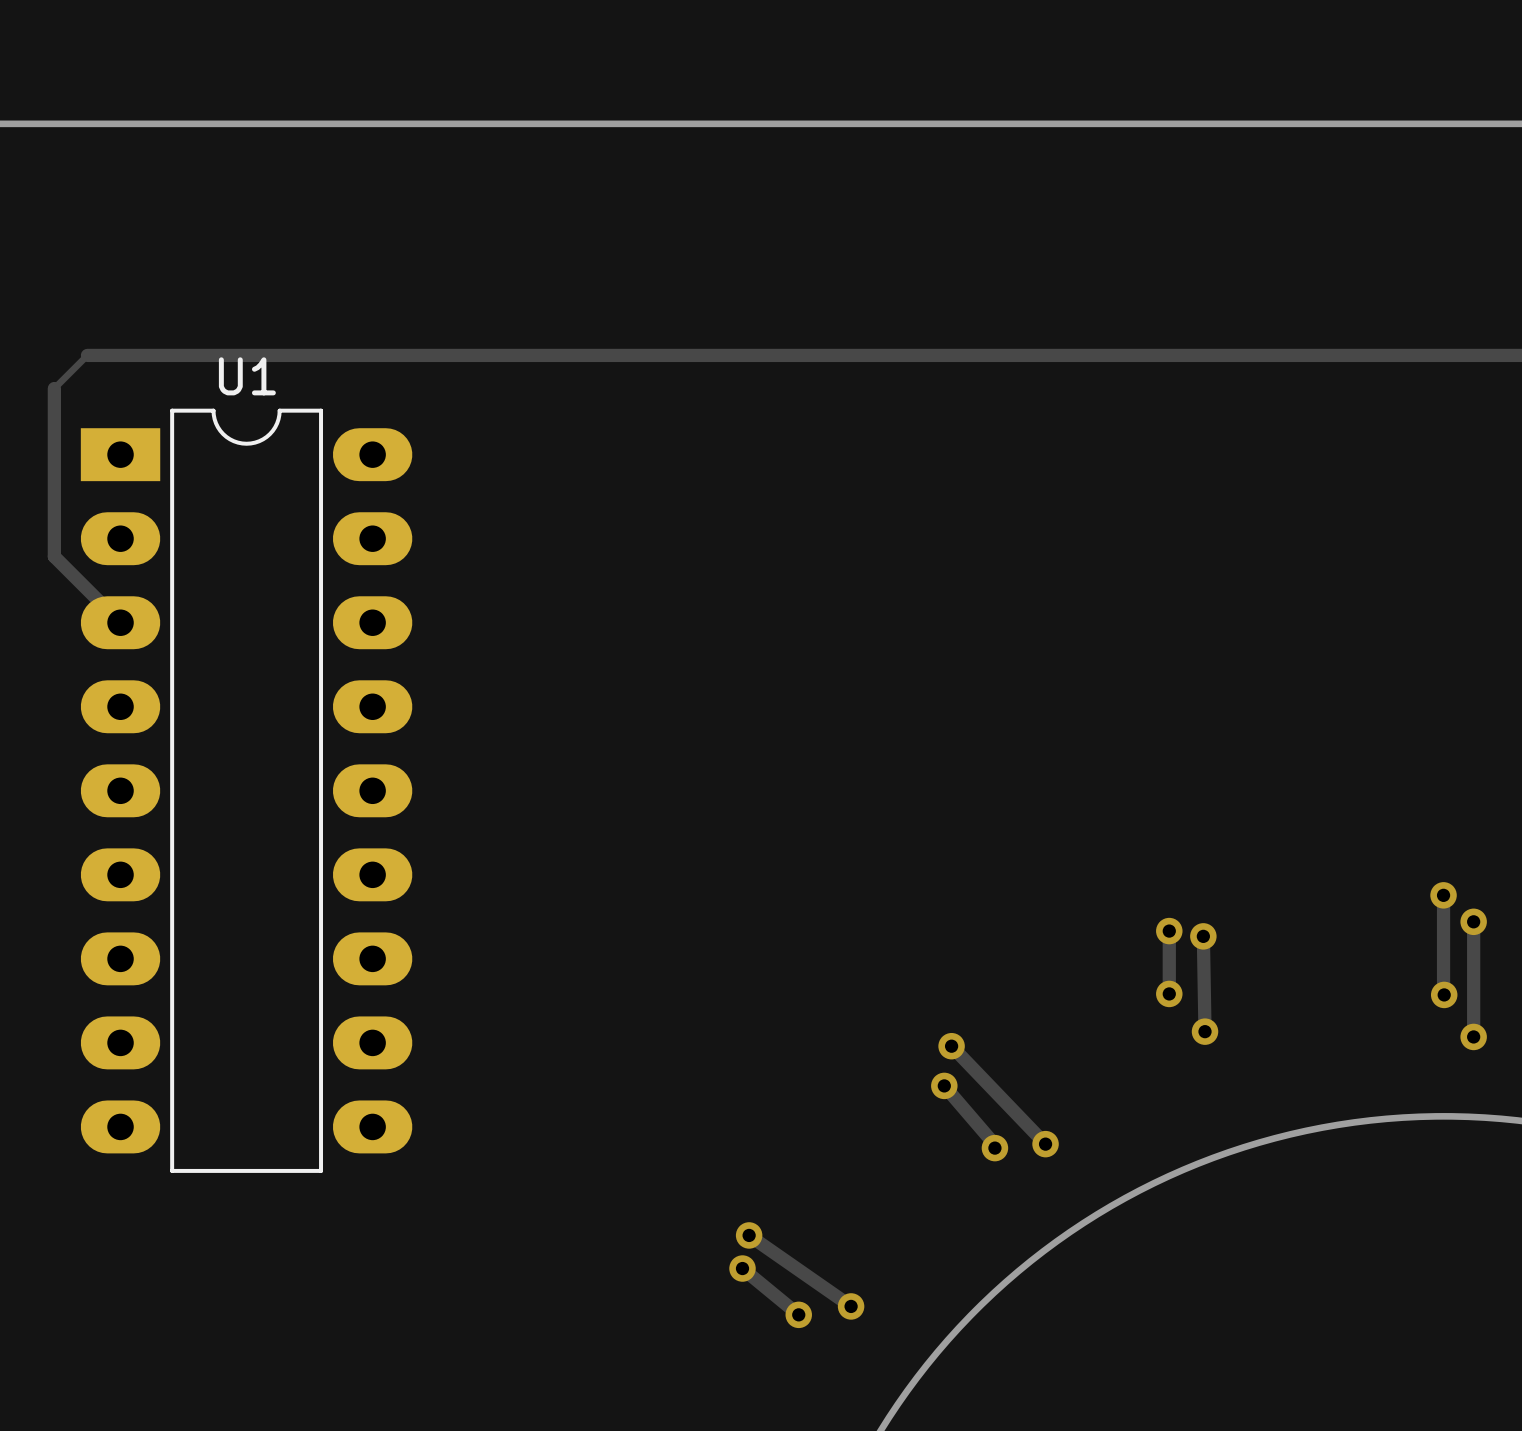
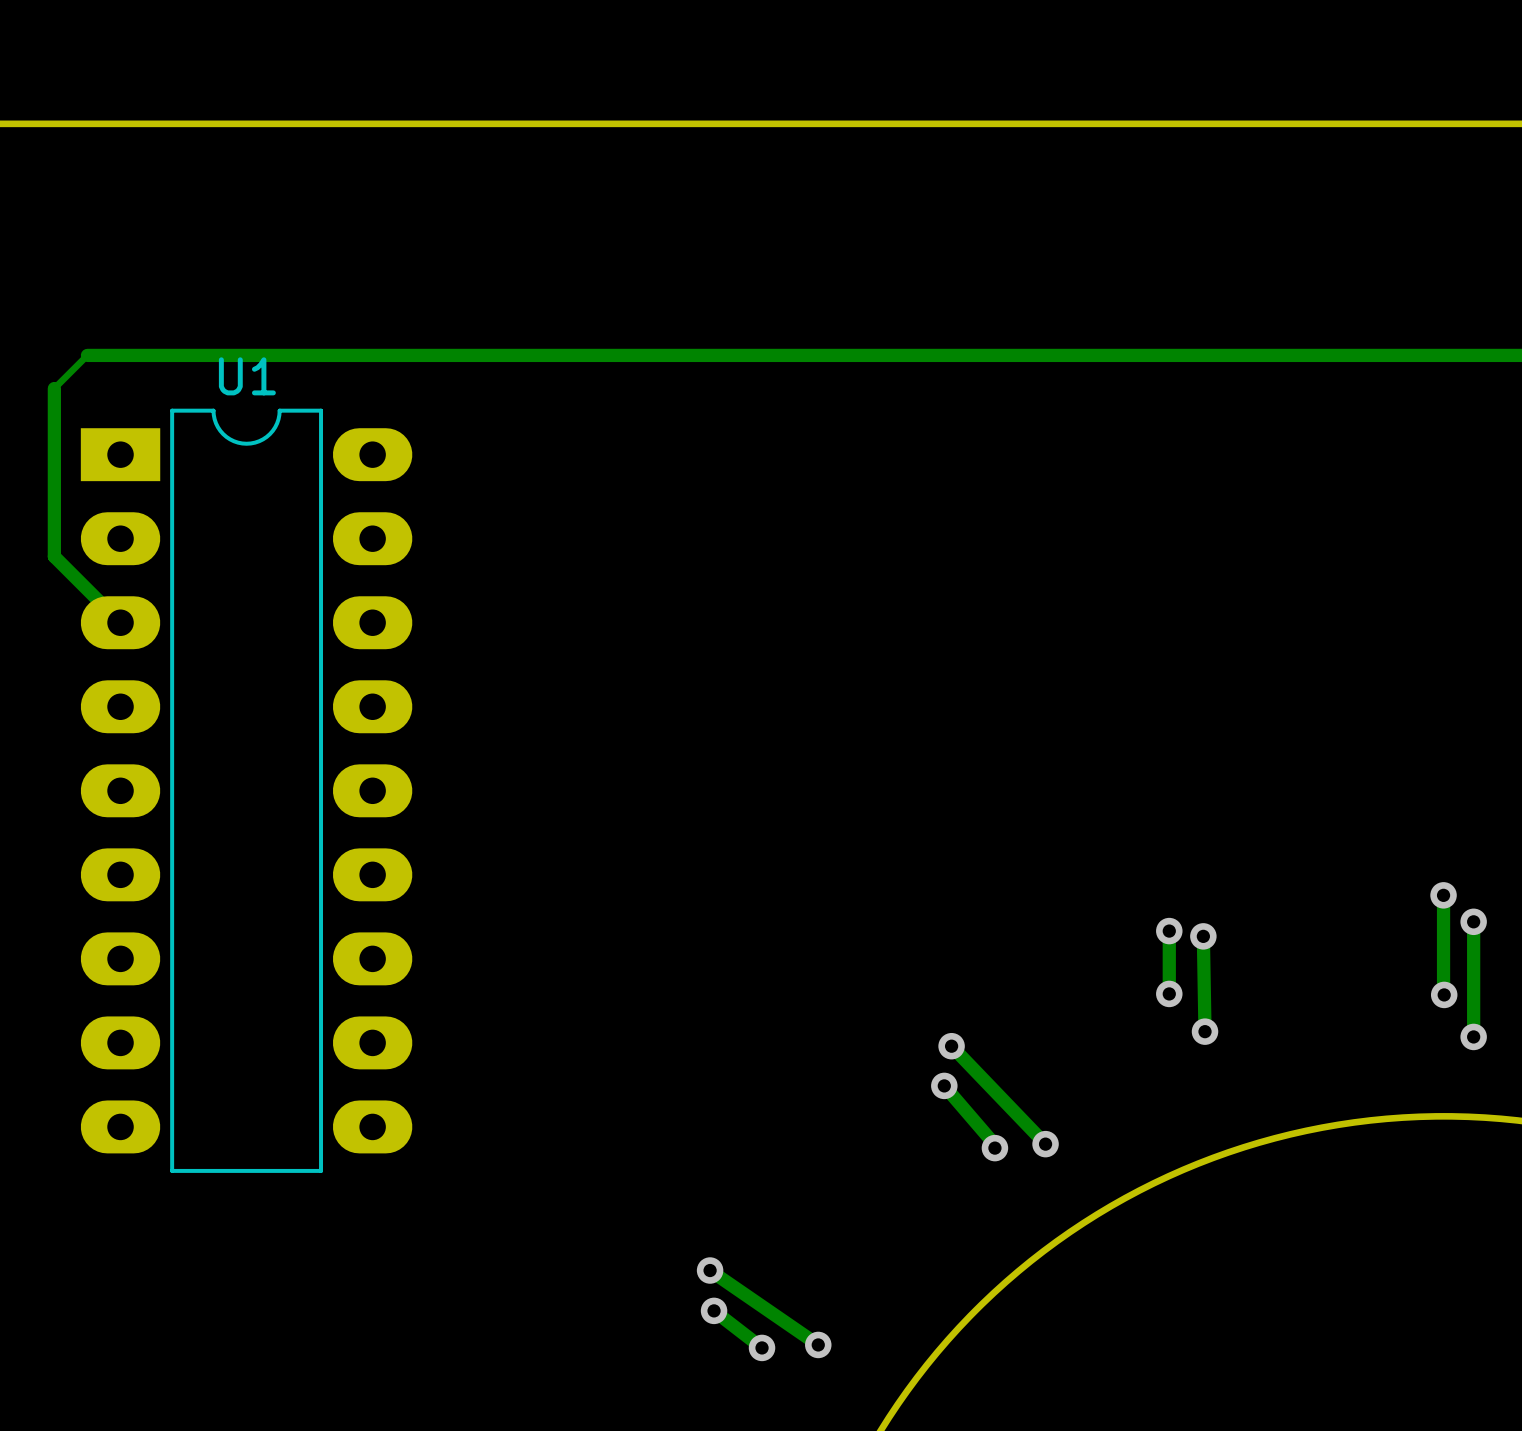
track: (749, 1235) (851, 1306) -> none
via: (749, 1235) -> none
track: (742, 1268) (798, 1314) -> none
via: (742, 1268) -> none
track: none -> (710, 1270) (818, 1344)
via: none -> (710, 1270)
via: (851, 1306) -> none
track: none -> (714, 1310) (762, 1347)
via: none -> (714, 1310)
via: (798, 1314) -> none
via: none -> (818, 1344)
via: none -> (762, 1347)

